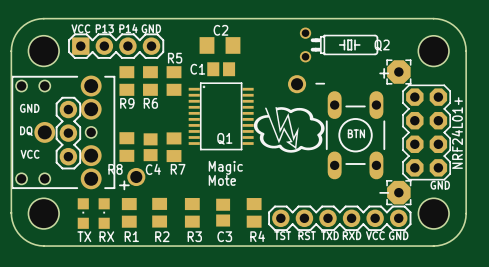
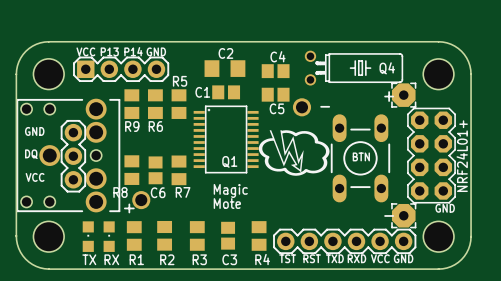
Q2: (339, 44) -> none
Q4: none -> (353, 68)
C4: none -> (275, 71)
C5: none -> (275, 94)
C4 name: C4 (153, 169) -> C6 (158, 192)

